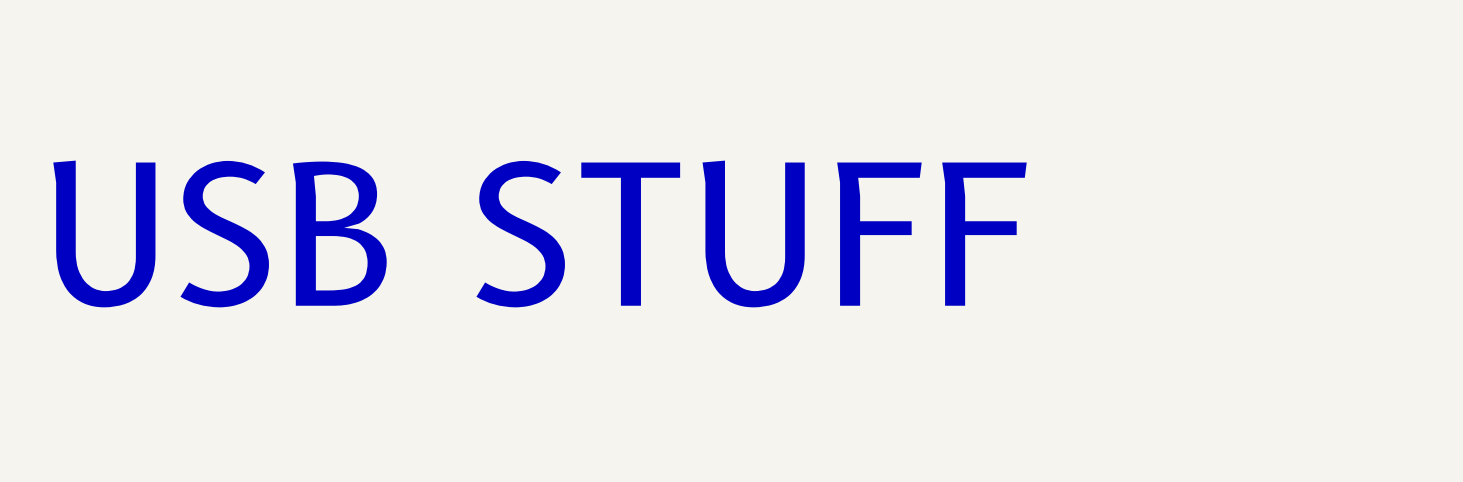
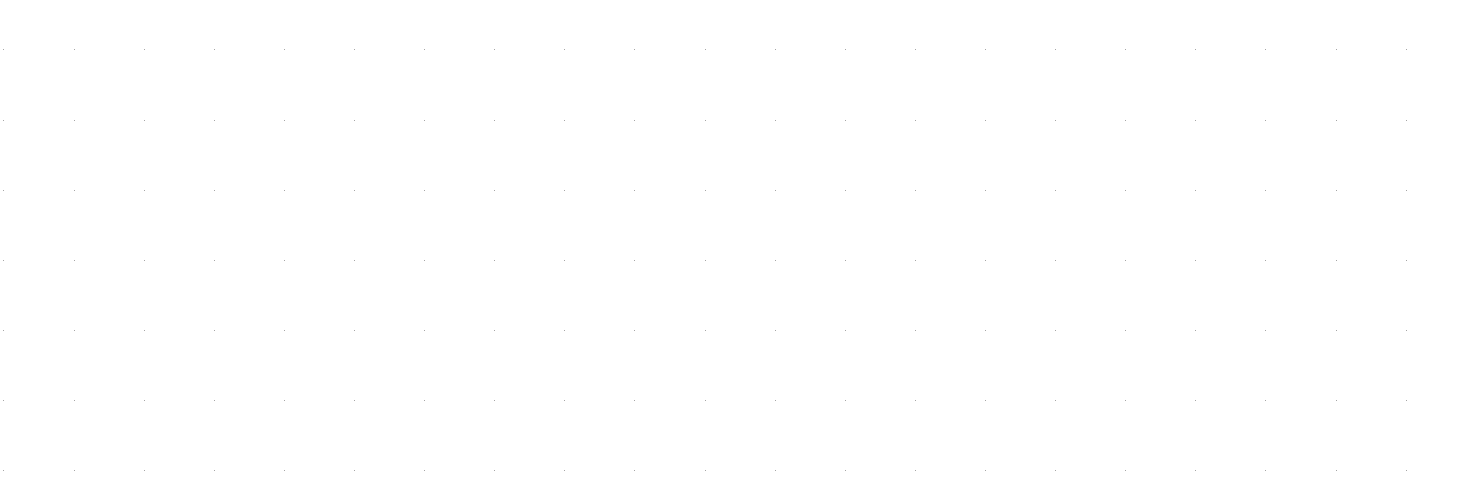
text: USB STUFF (540, 233) -> none

